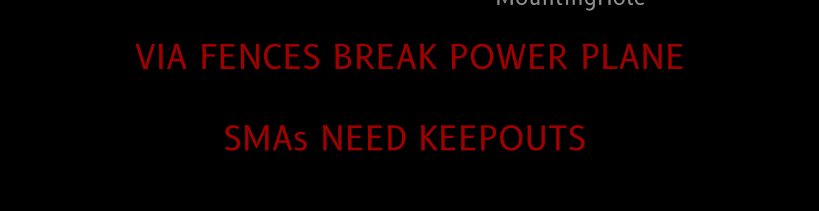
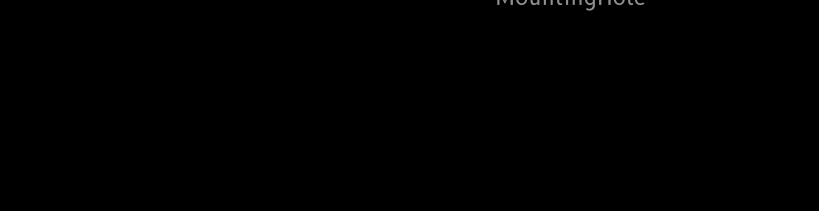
text: VIA FENCES BREAK POWER PLANE (408, 56) -> none
text: SMAs NEED KEEPOUTS (404, 137) -> none

